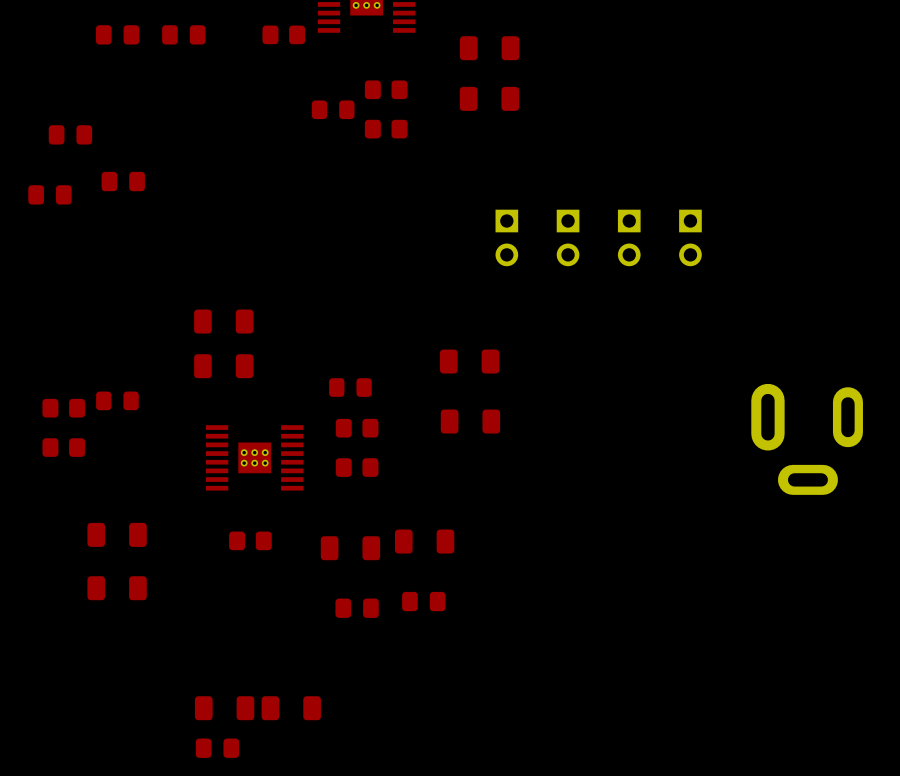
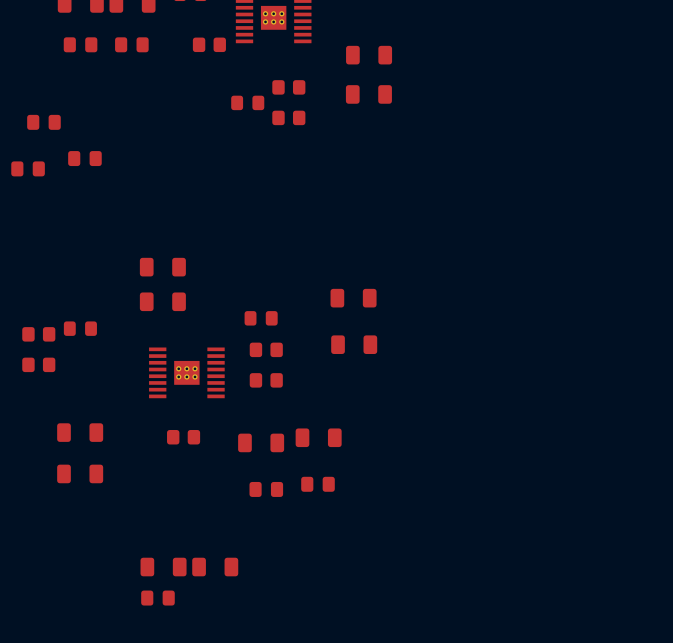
part: (506, 237) -> none
part: (568, 237) -> none
part: (629, 237) -> none
part: (690, 237) -> none
part: (807, 439) -> none

